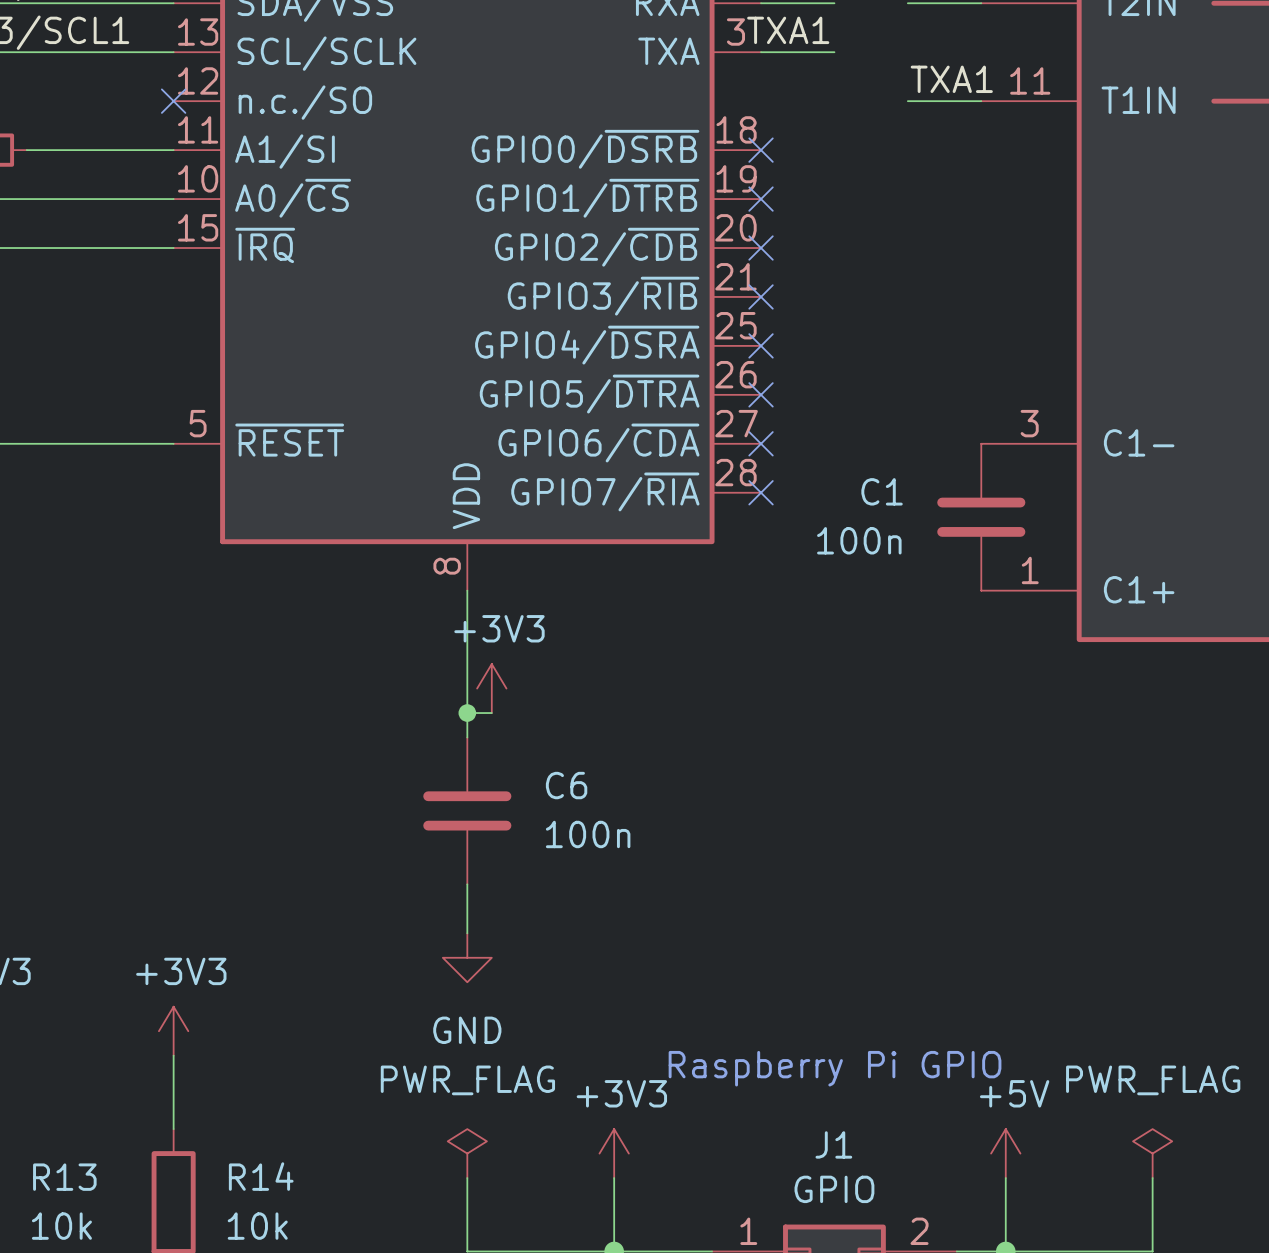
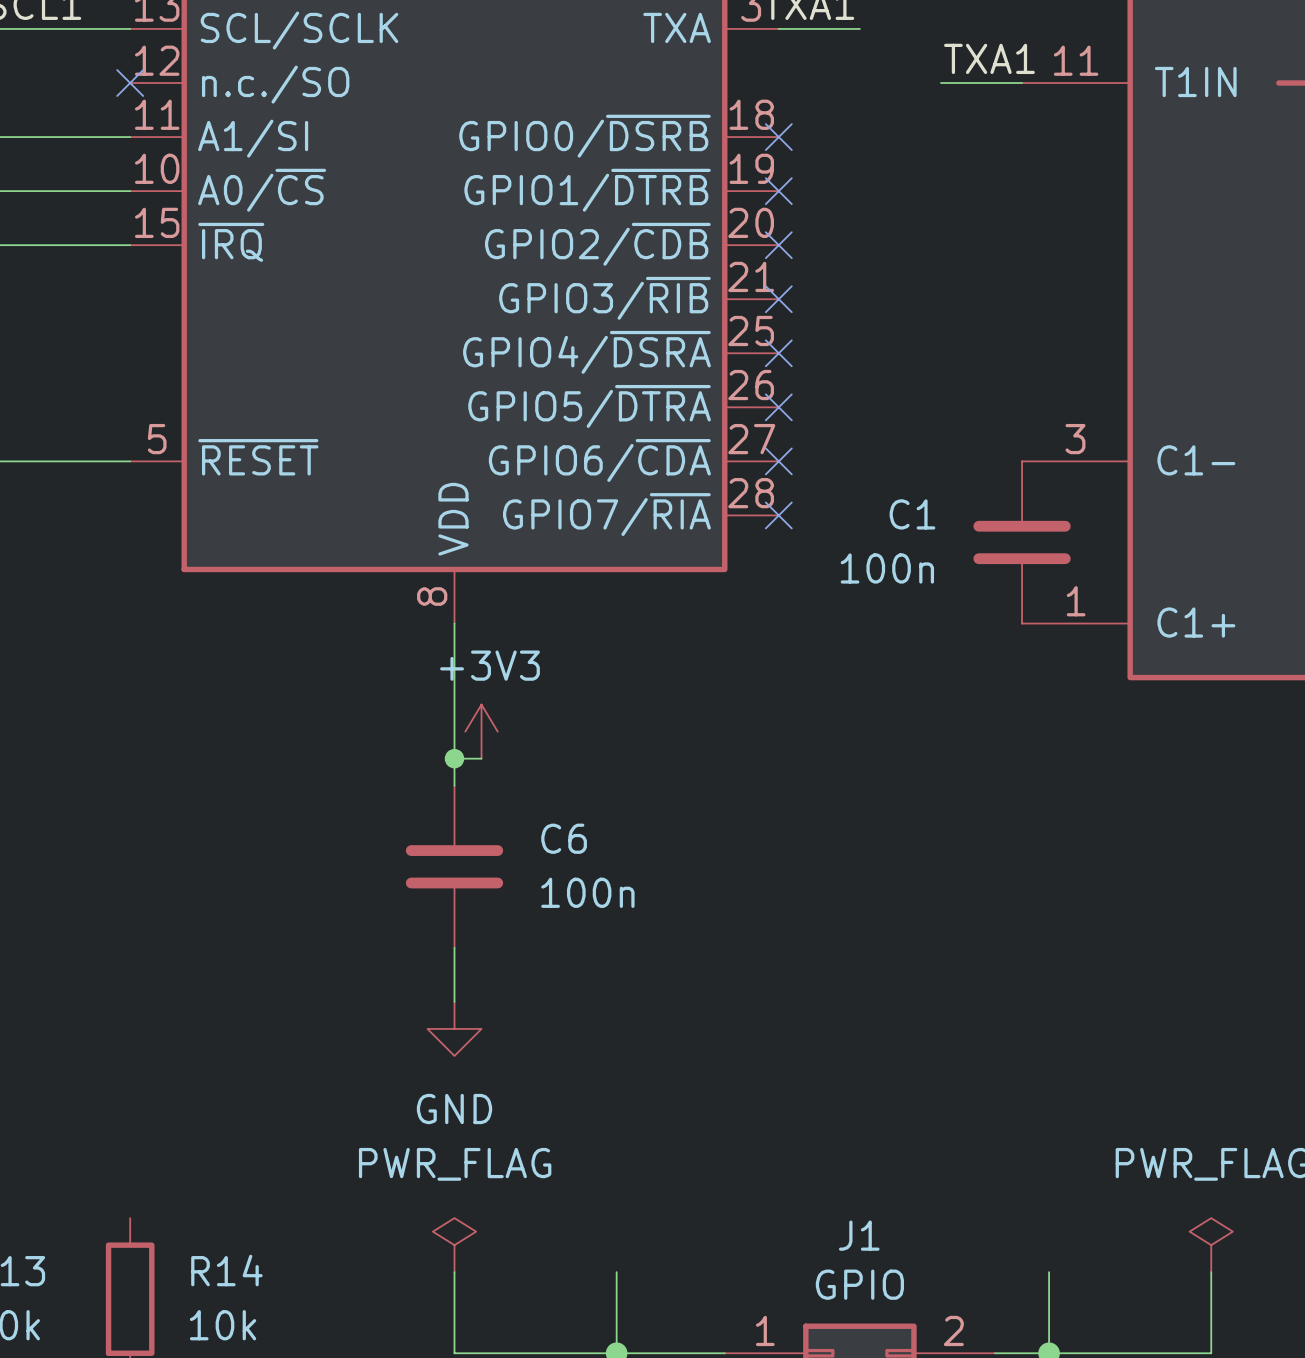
power symbol: +3V3 (173, 1031) -> none
wire: (173, 1055) (173, 1129) -> none
text: Raspberry Pi GPIO (835, 1068) -> none
power symbol: +3V3 (614, 1153) -> none
power symbol: +5V (1005, 1153) -> none

